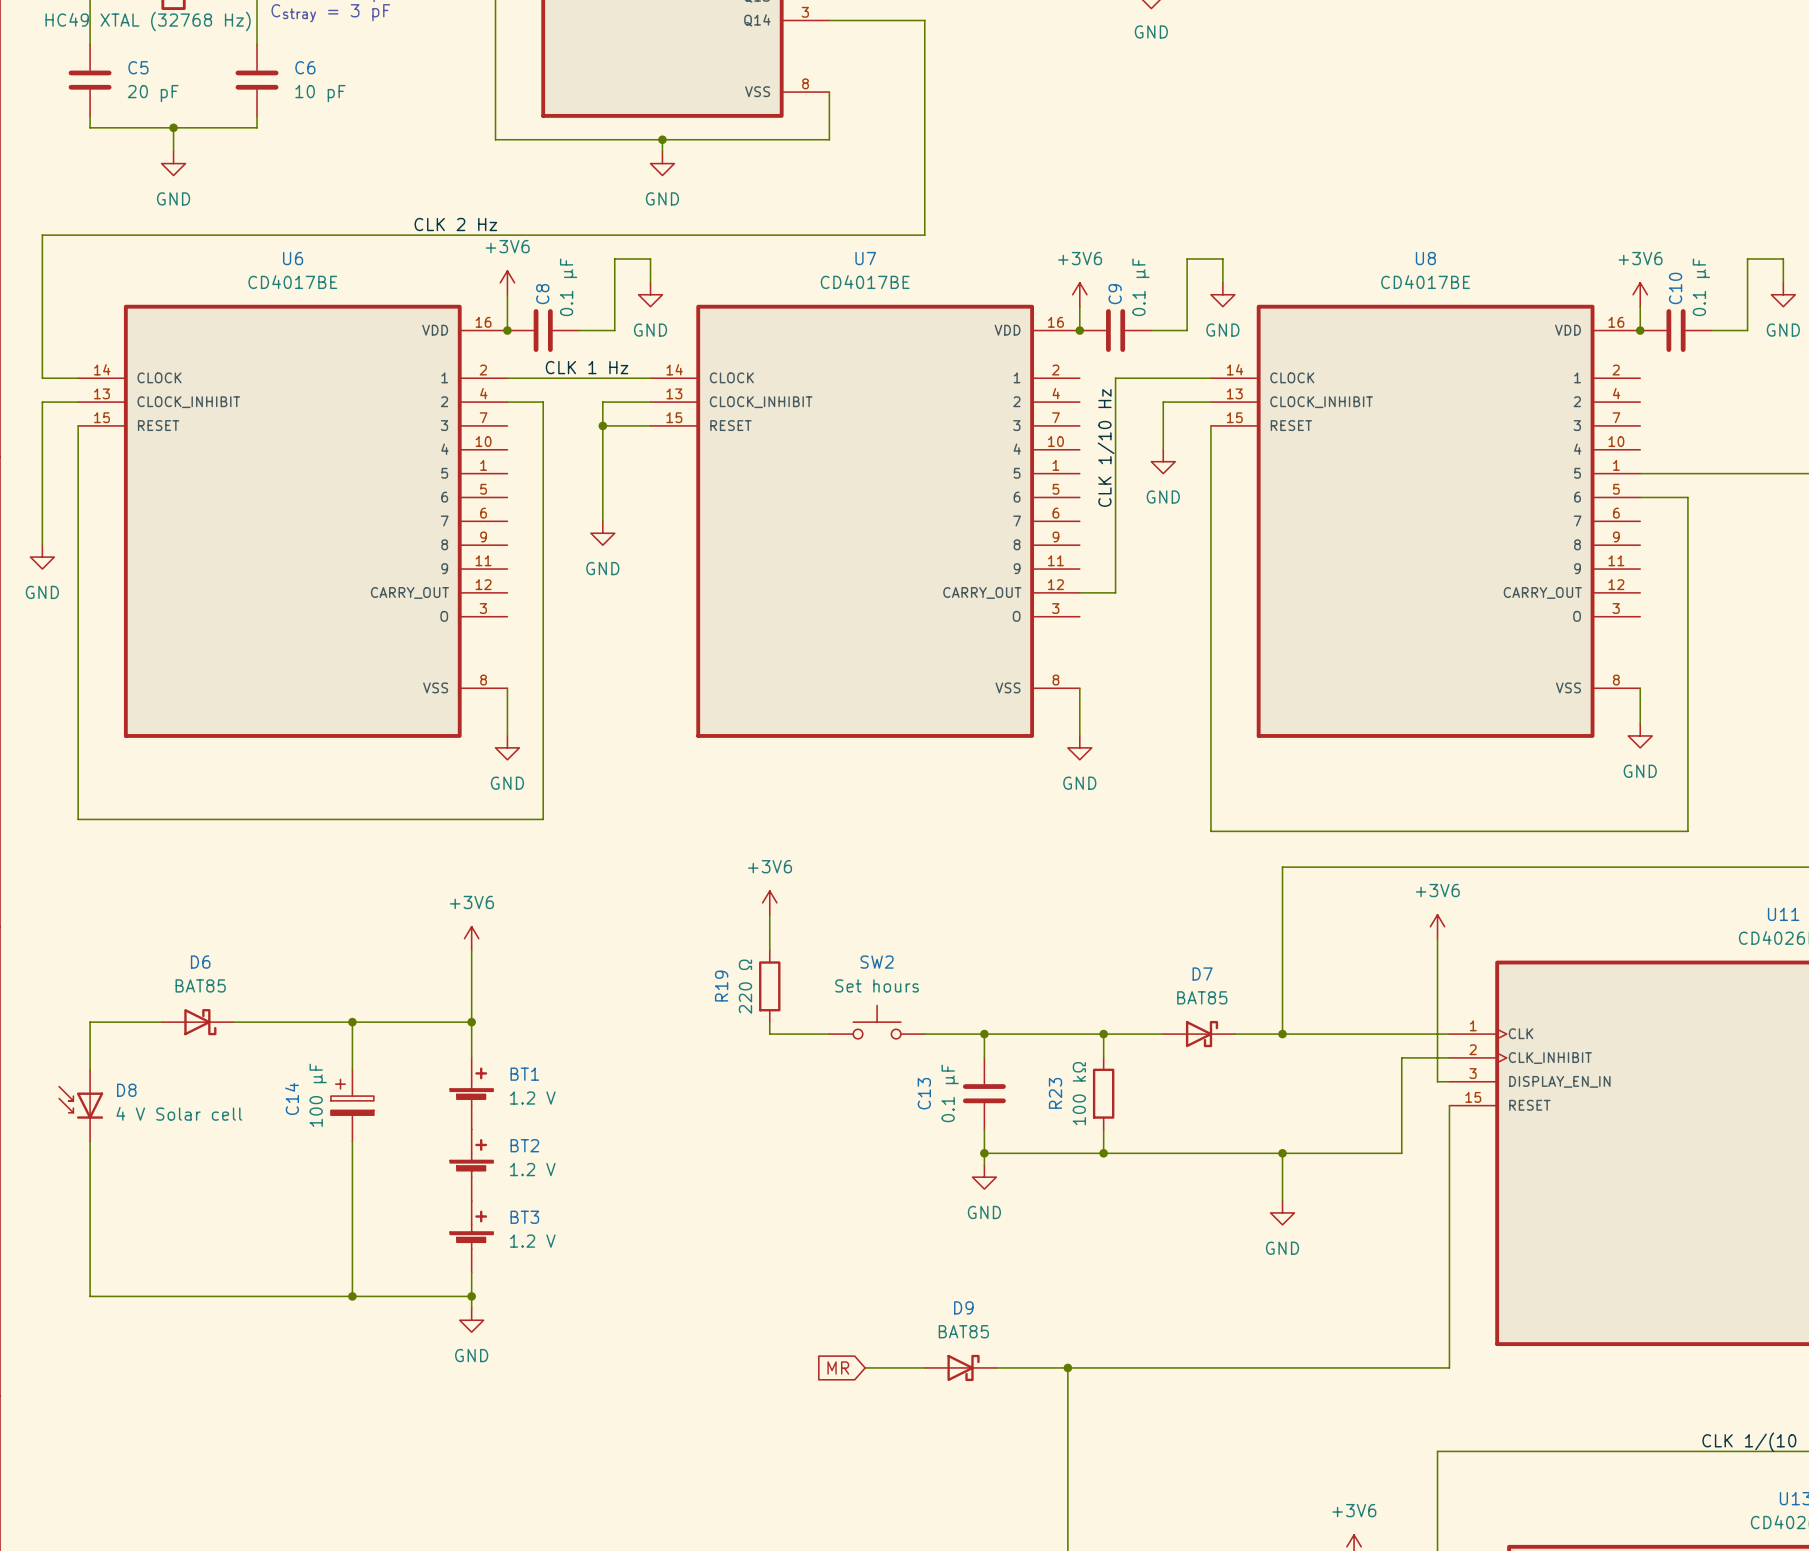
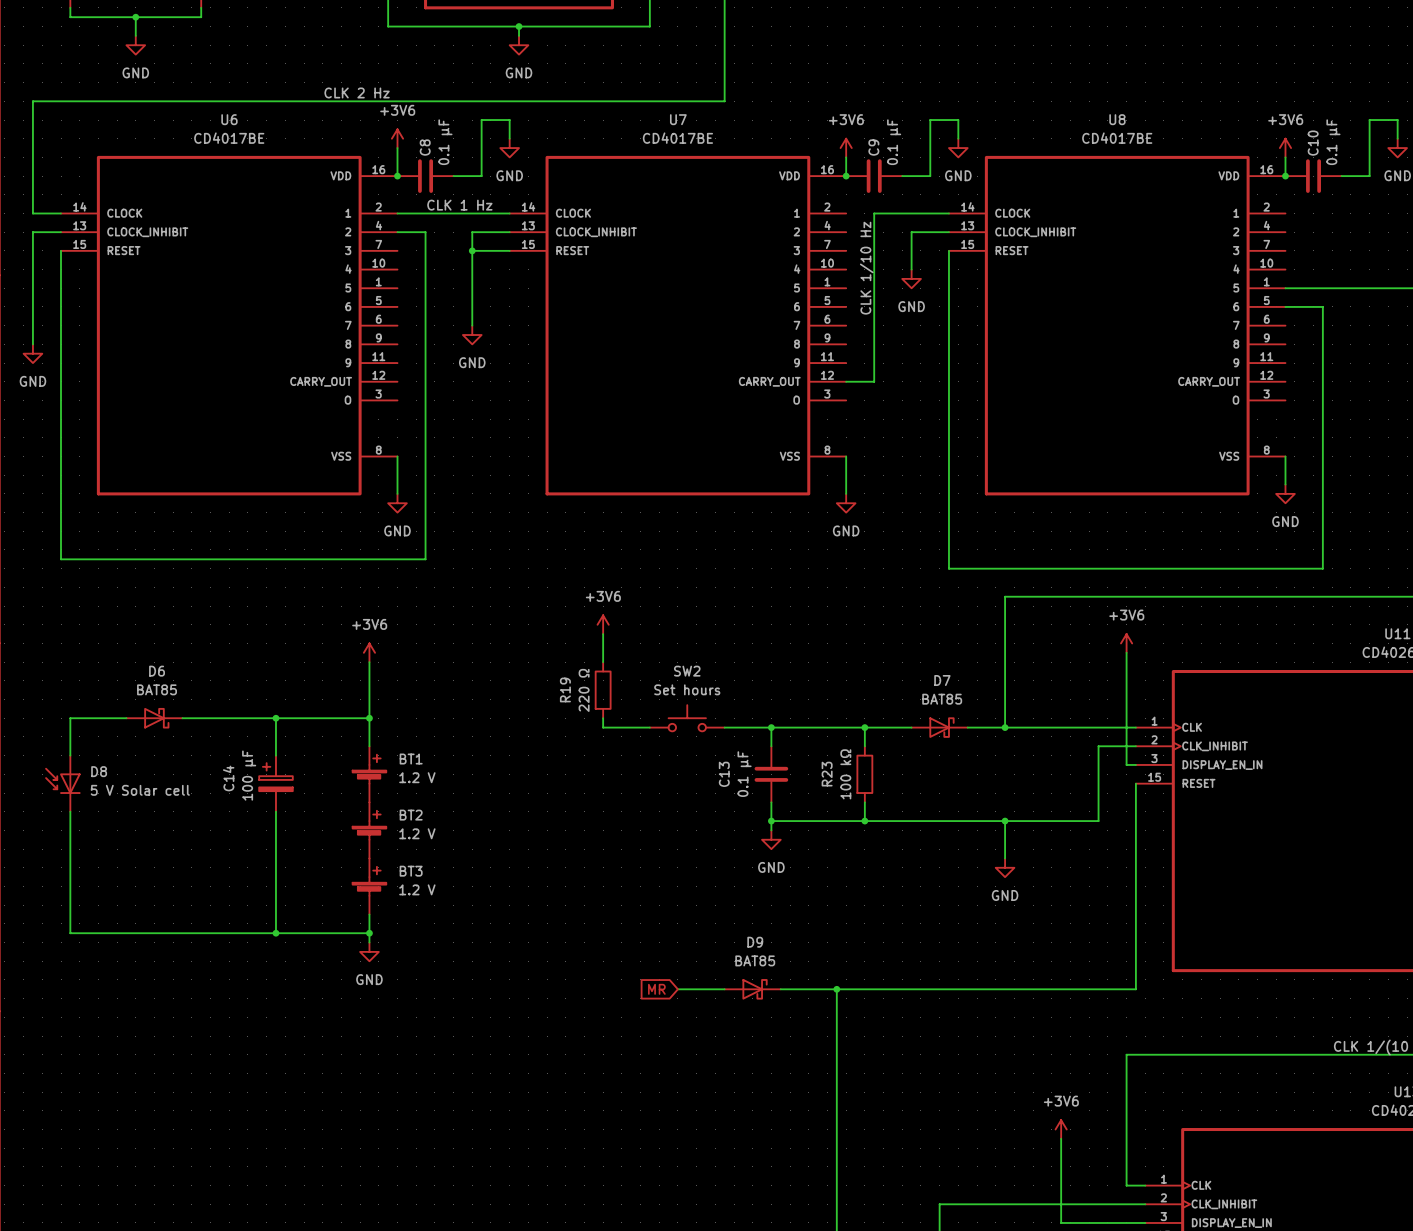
D8 value: 4 V Solar cell (179, 1113) -> 5 V Solar cell (140, 790)

